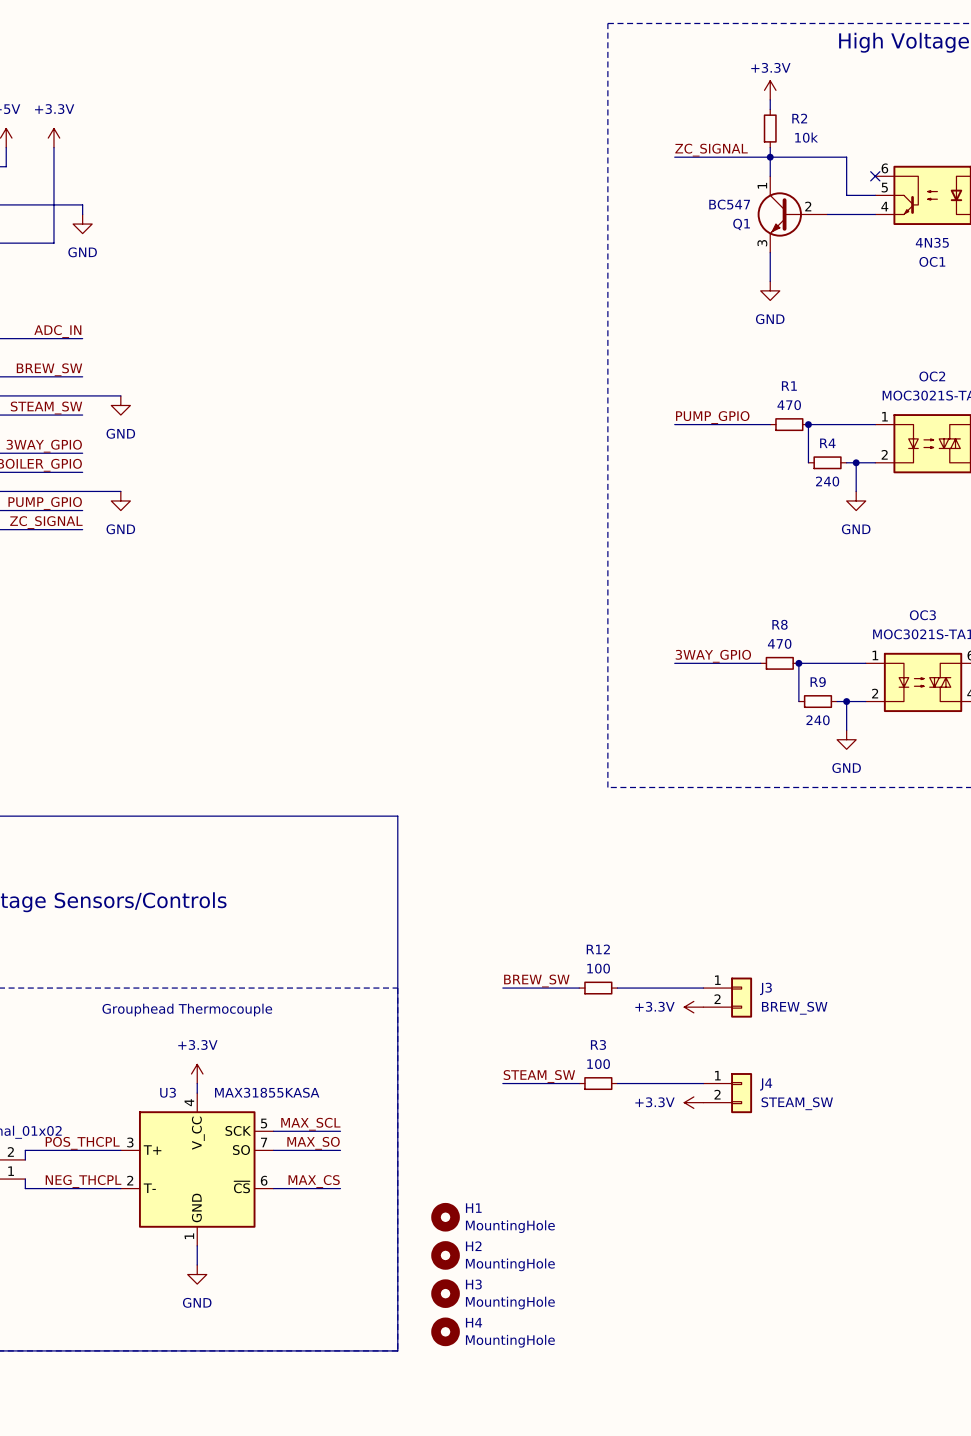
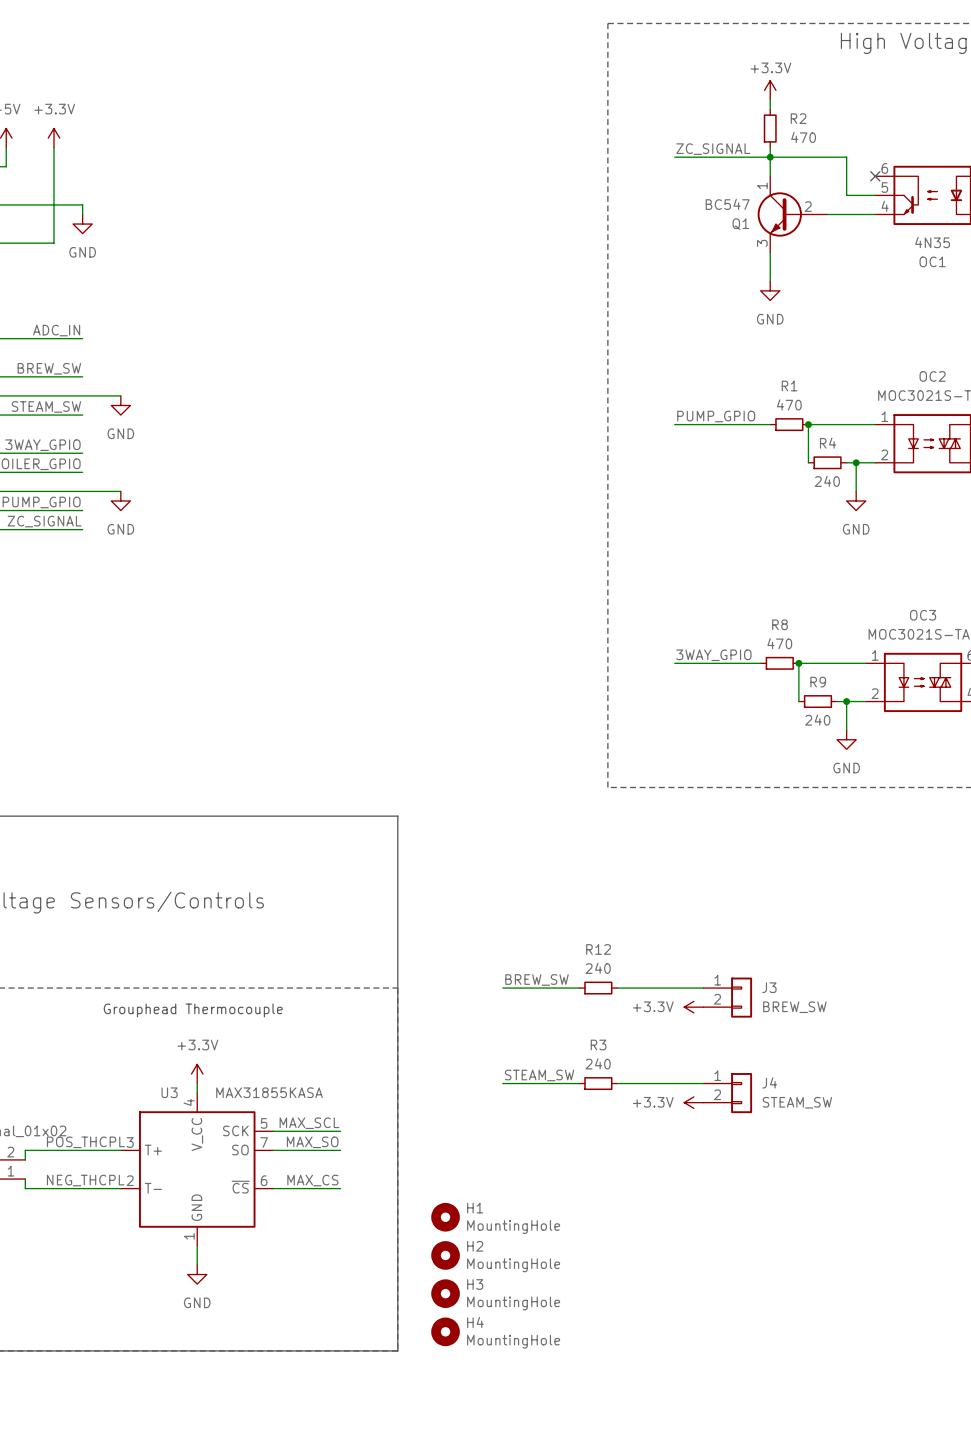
R2 value: 10k (806, 137) -> 470 (803, 137)
R12 value: 100 (598, 968) -> 240 (598, 968)
R3 value: 100 (598, 1064) -> 240 (598, 1063)

